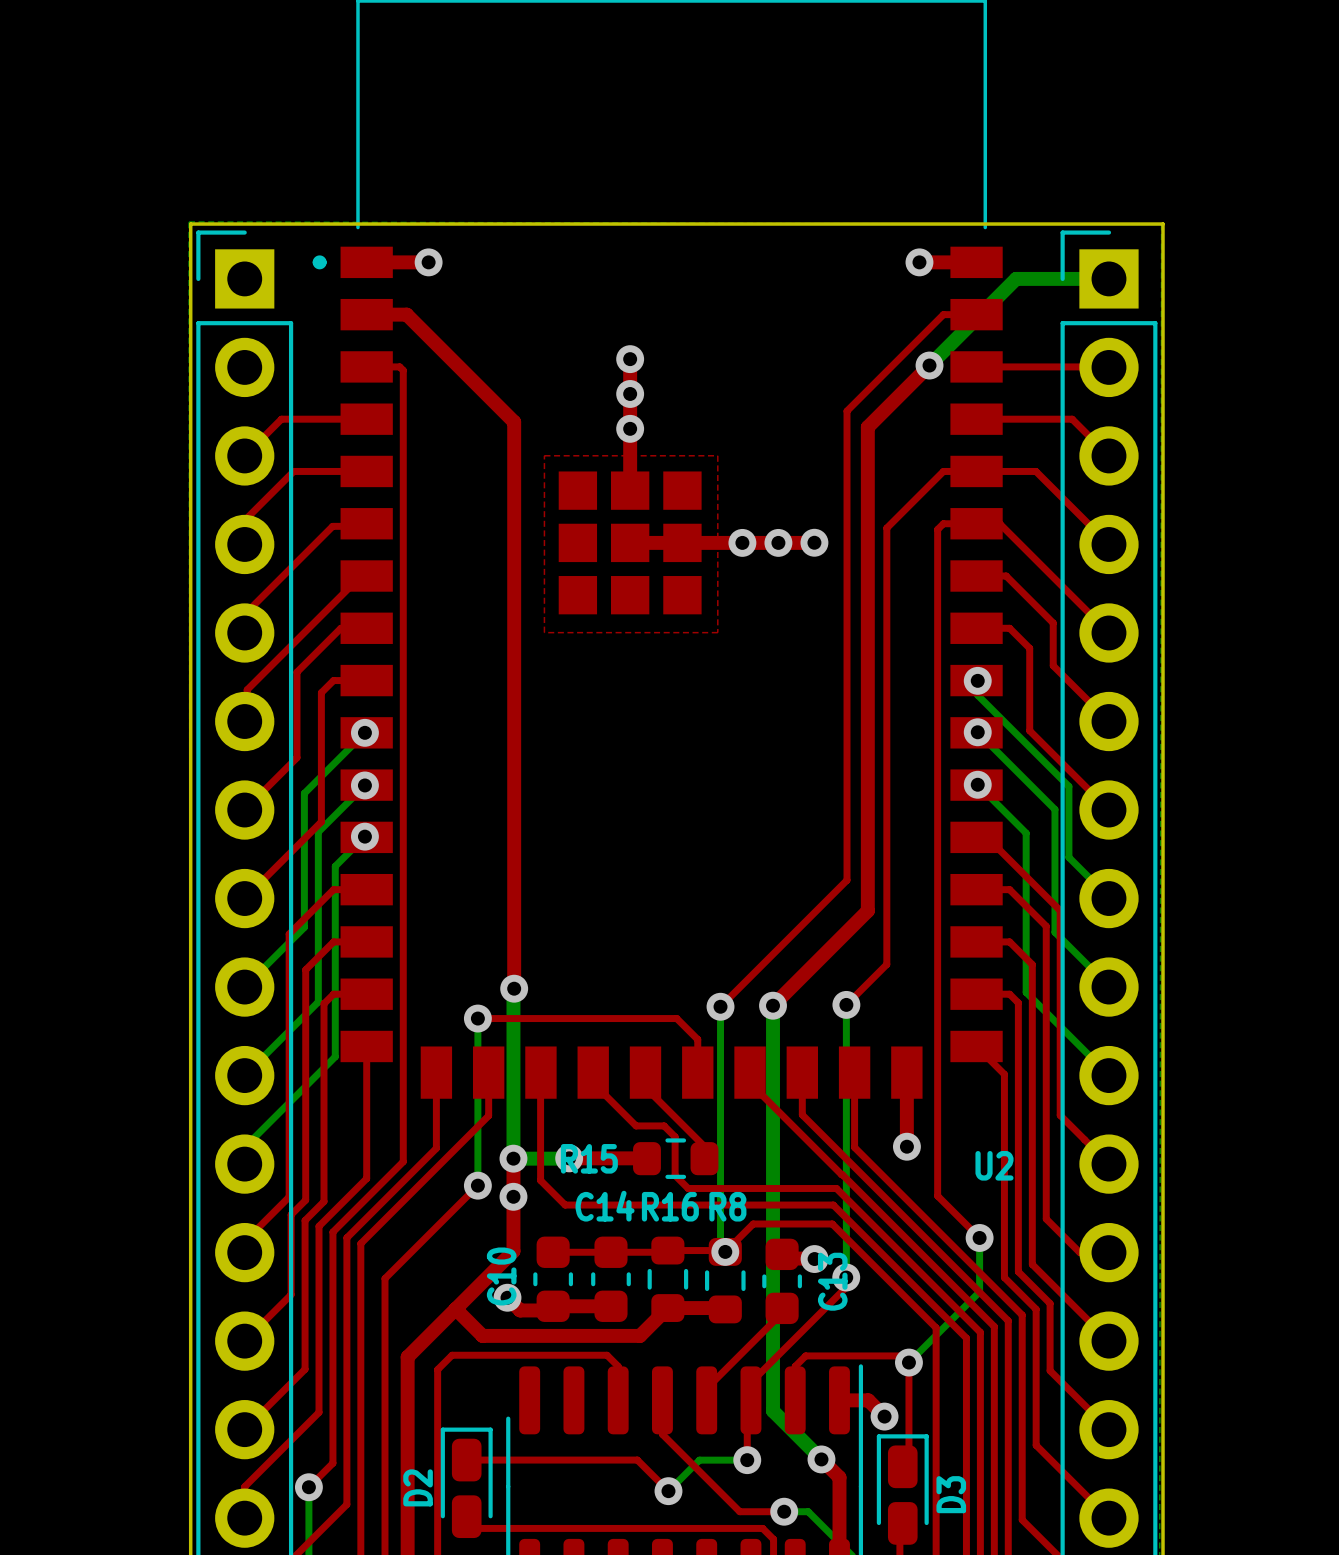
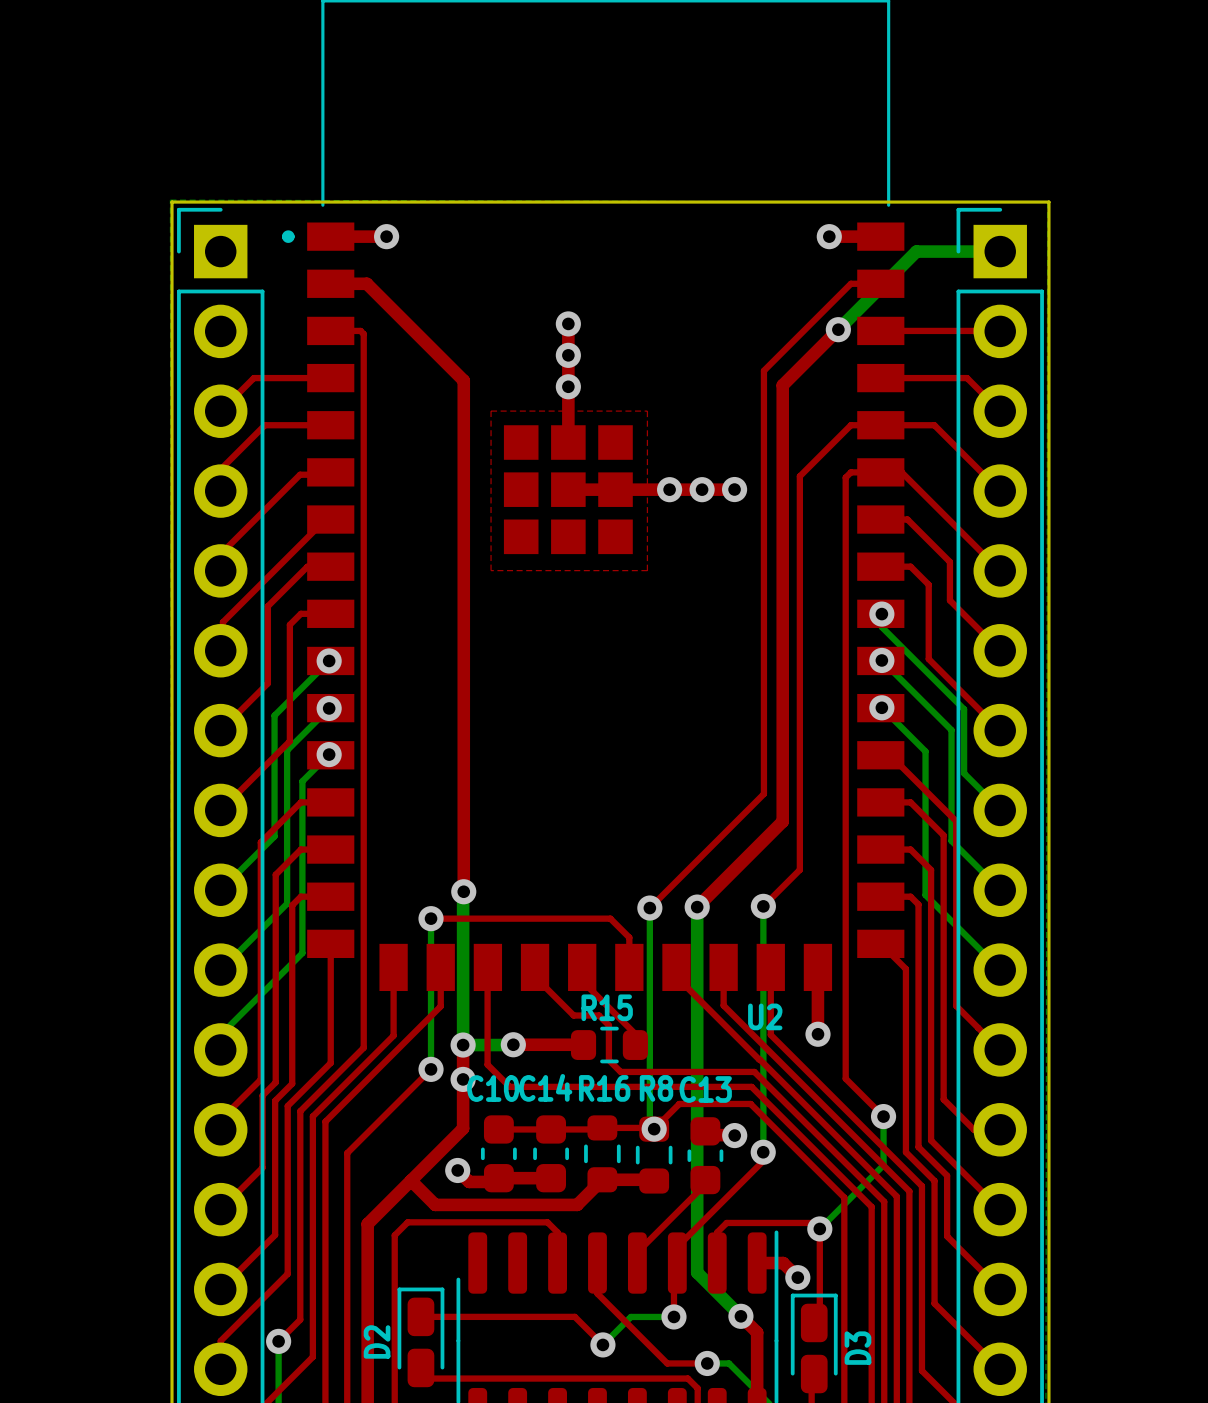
R15 name position: R15 (589, 1158) -> R15 (607, 1007)
U2 name position: U2 (994, 1165) -> U2 (765, 1016)
C10 name rotation: 0° (501, 1276) -> 90° clockwise (493, 1088)
C10 name position: C10 (501, 1276) -> C10 (493, 1088)
C13 name rotation: 0° (832, 1281) -> 90° clockwise (705, 1089)
C13 name position: C13 (832, 1281) -> C13 (705, 1089)

